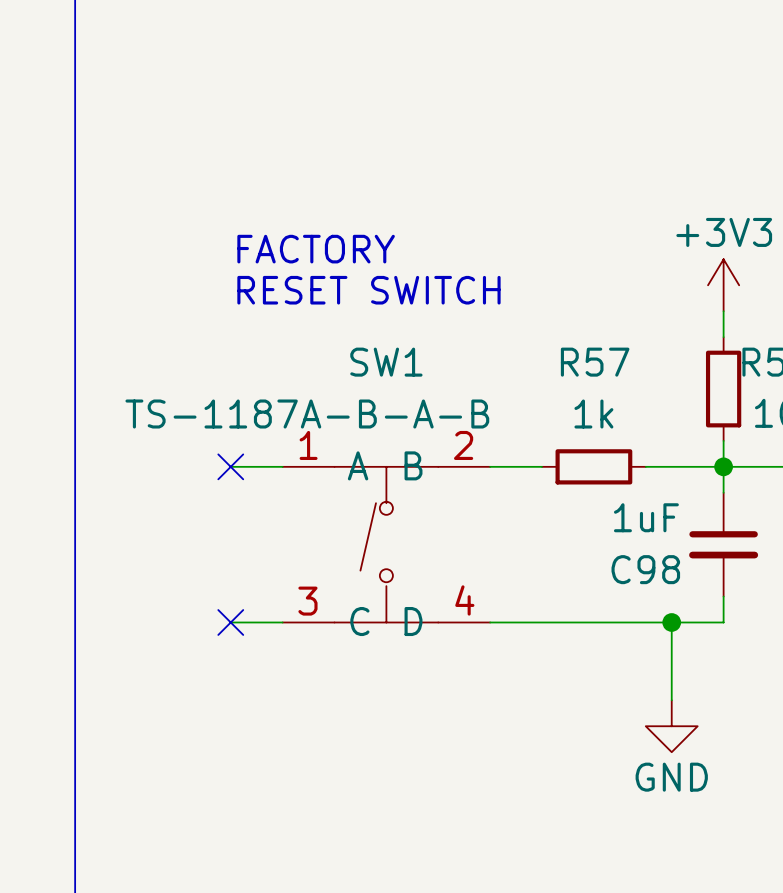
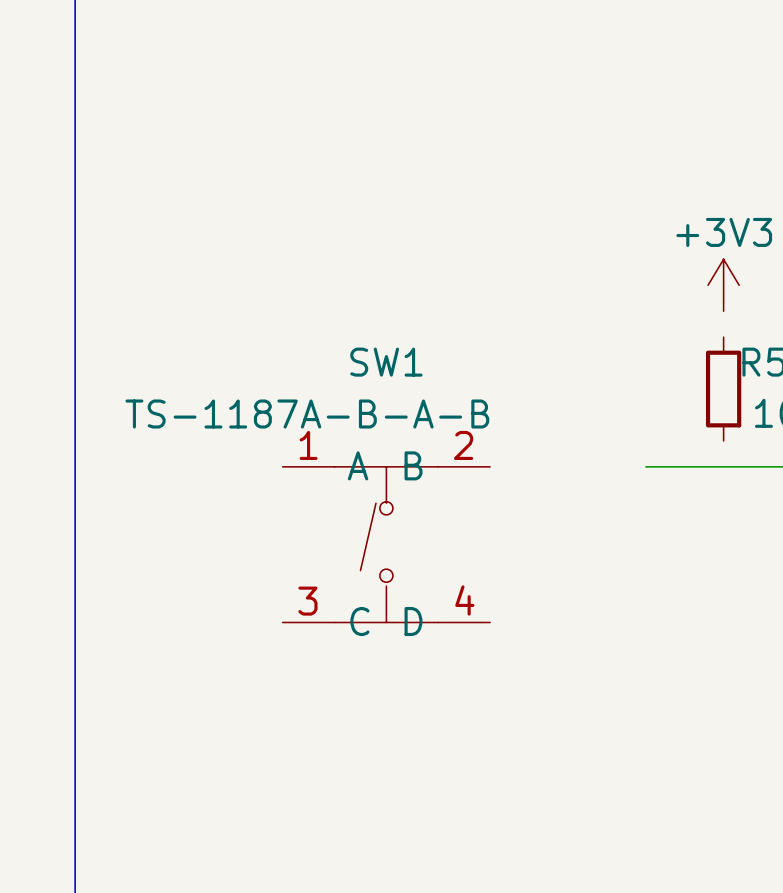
text: FACTORY (316, 249) -> none
text: RESET SWITCH (368, 290) -> none
wire: (723, 311) (723, 337) -> none
wire: (723, 440) (723, 492) -> none
wire: (230, 466) (282, 466) -> none
no-connect mark: (230, 466) -> none
wire: (490, 466) (542, 466) -> none
R57: 1k (593, 466) -> none
junction: (723, 466) -> none
C98: 1uF (723, 544) -> none
wire: (723, 596) (723, 622) (490, 622) -> none
wire: (230, 622) (282, 622) -> none
no-connect mark: (230, 622) -> none
wire: (671, 622) (671, 700) -> none
junction: (671, 622) -> none
power symbol: GND (671, 726) -> none

